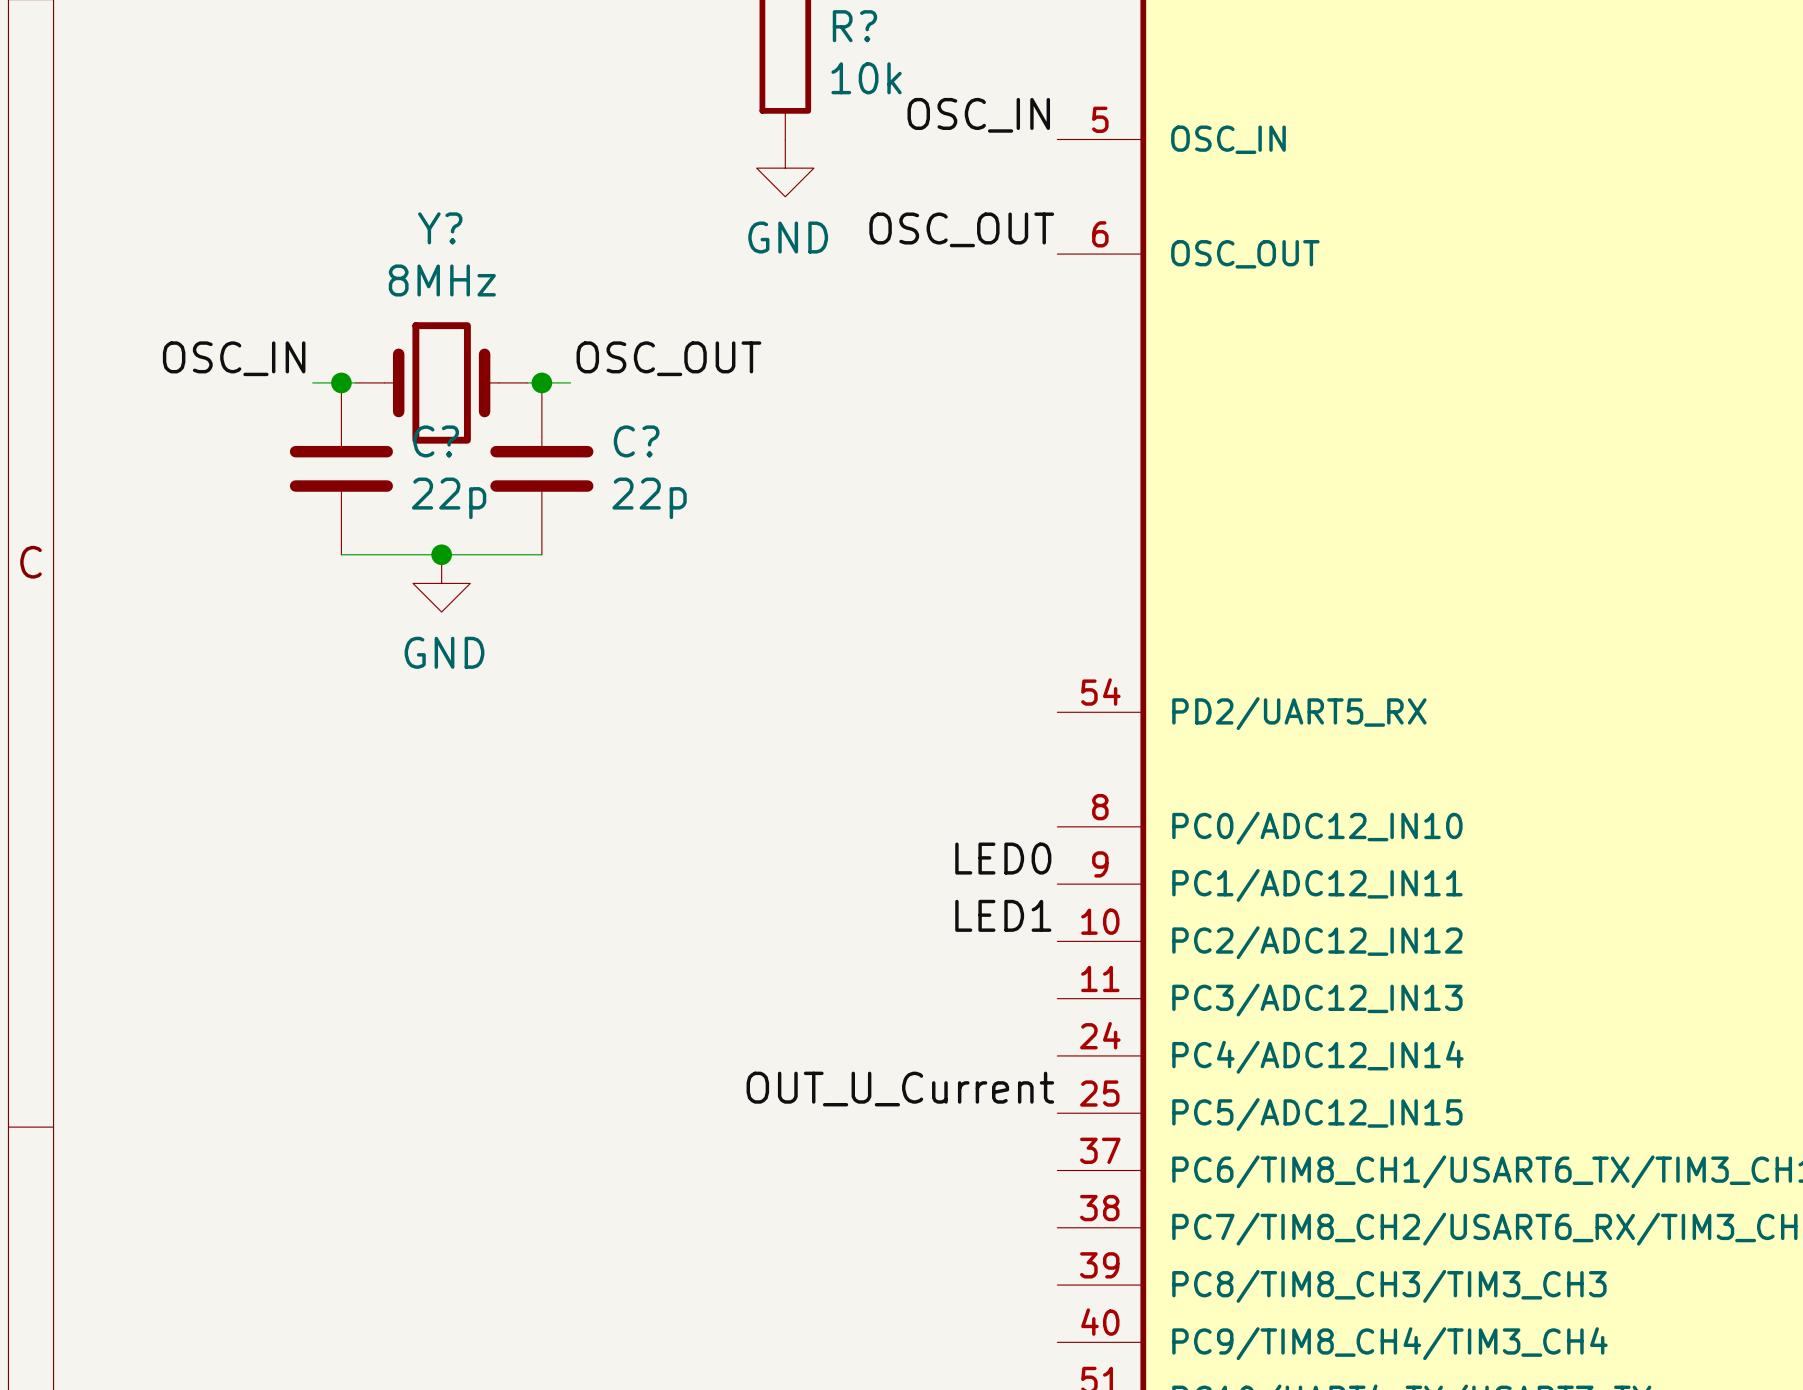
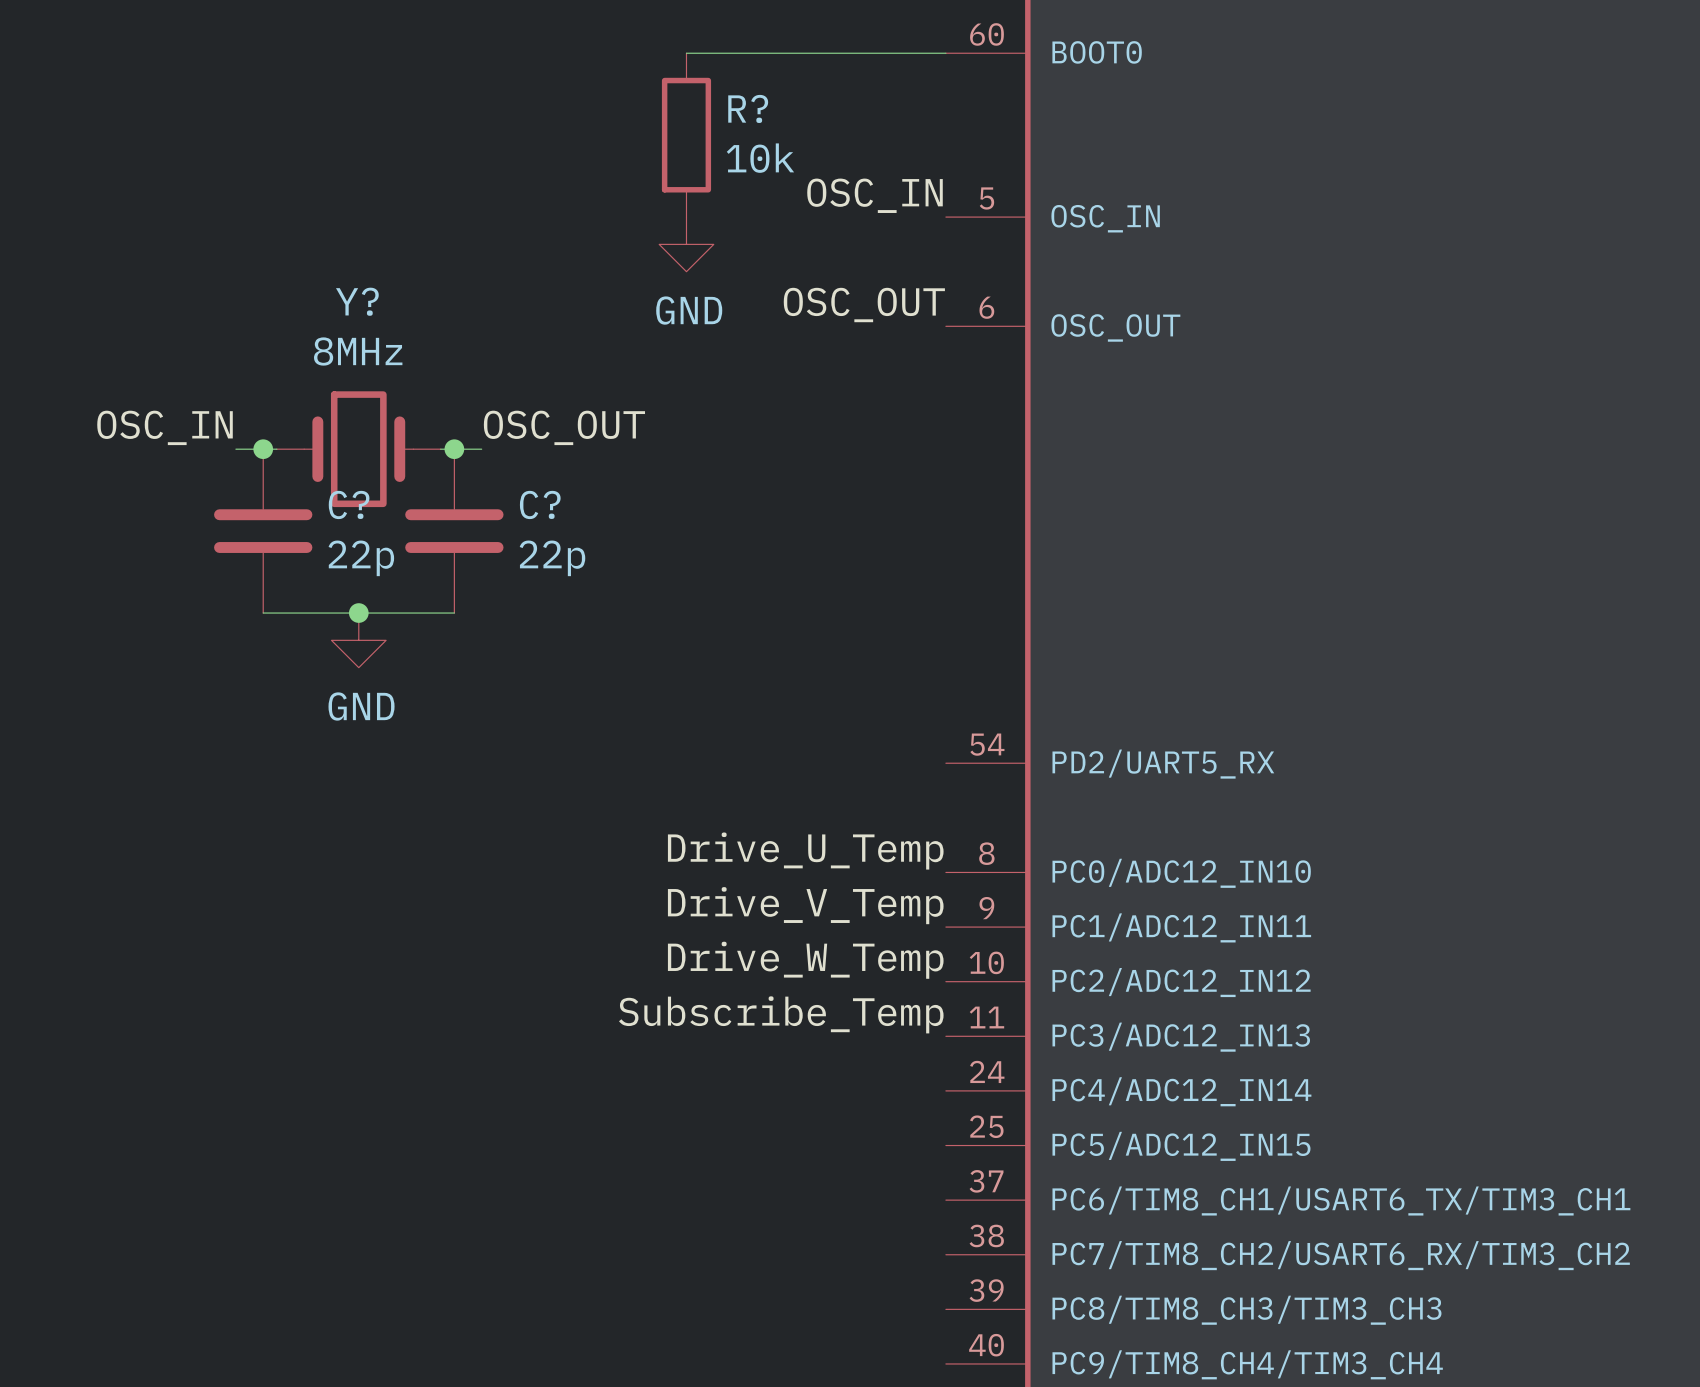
label: none -> Drive_U_Temp (805, 851)
label: LED0 (1003, 858) -> Drive_V_Temp (805, 905)
label: LED1 (1003, 915) -> Drive_W_Temp (805, 960)
label: none -> Subscribe_Temp (781, 1014)
label: OUT_U_Current (900, 1089) -> none

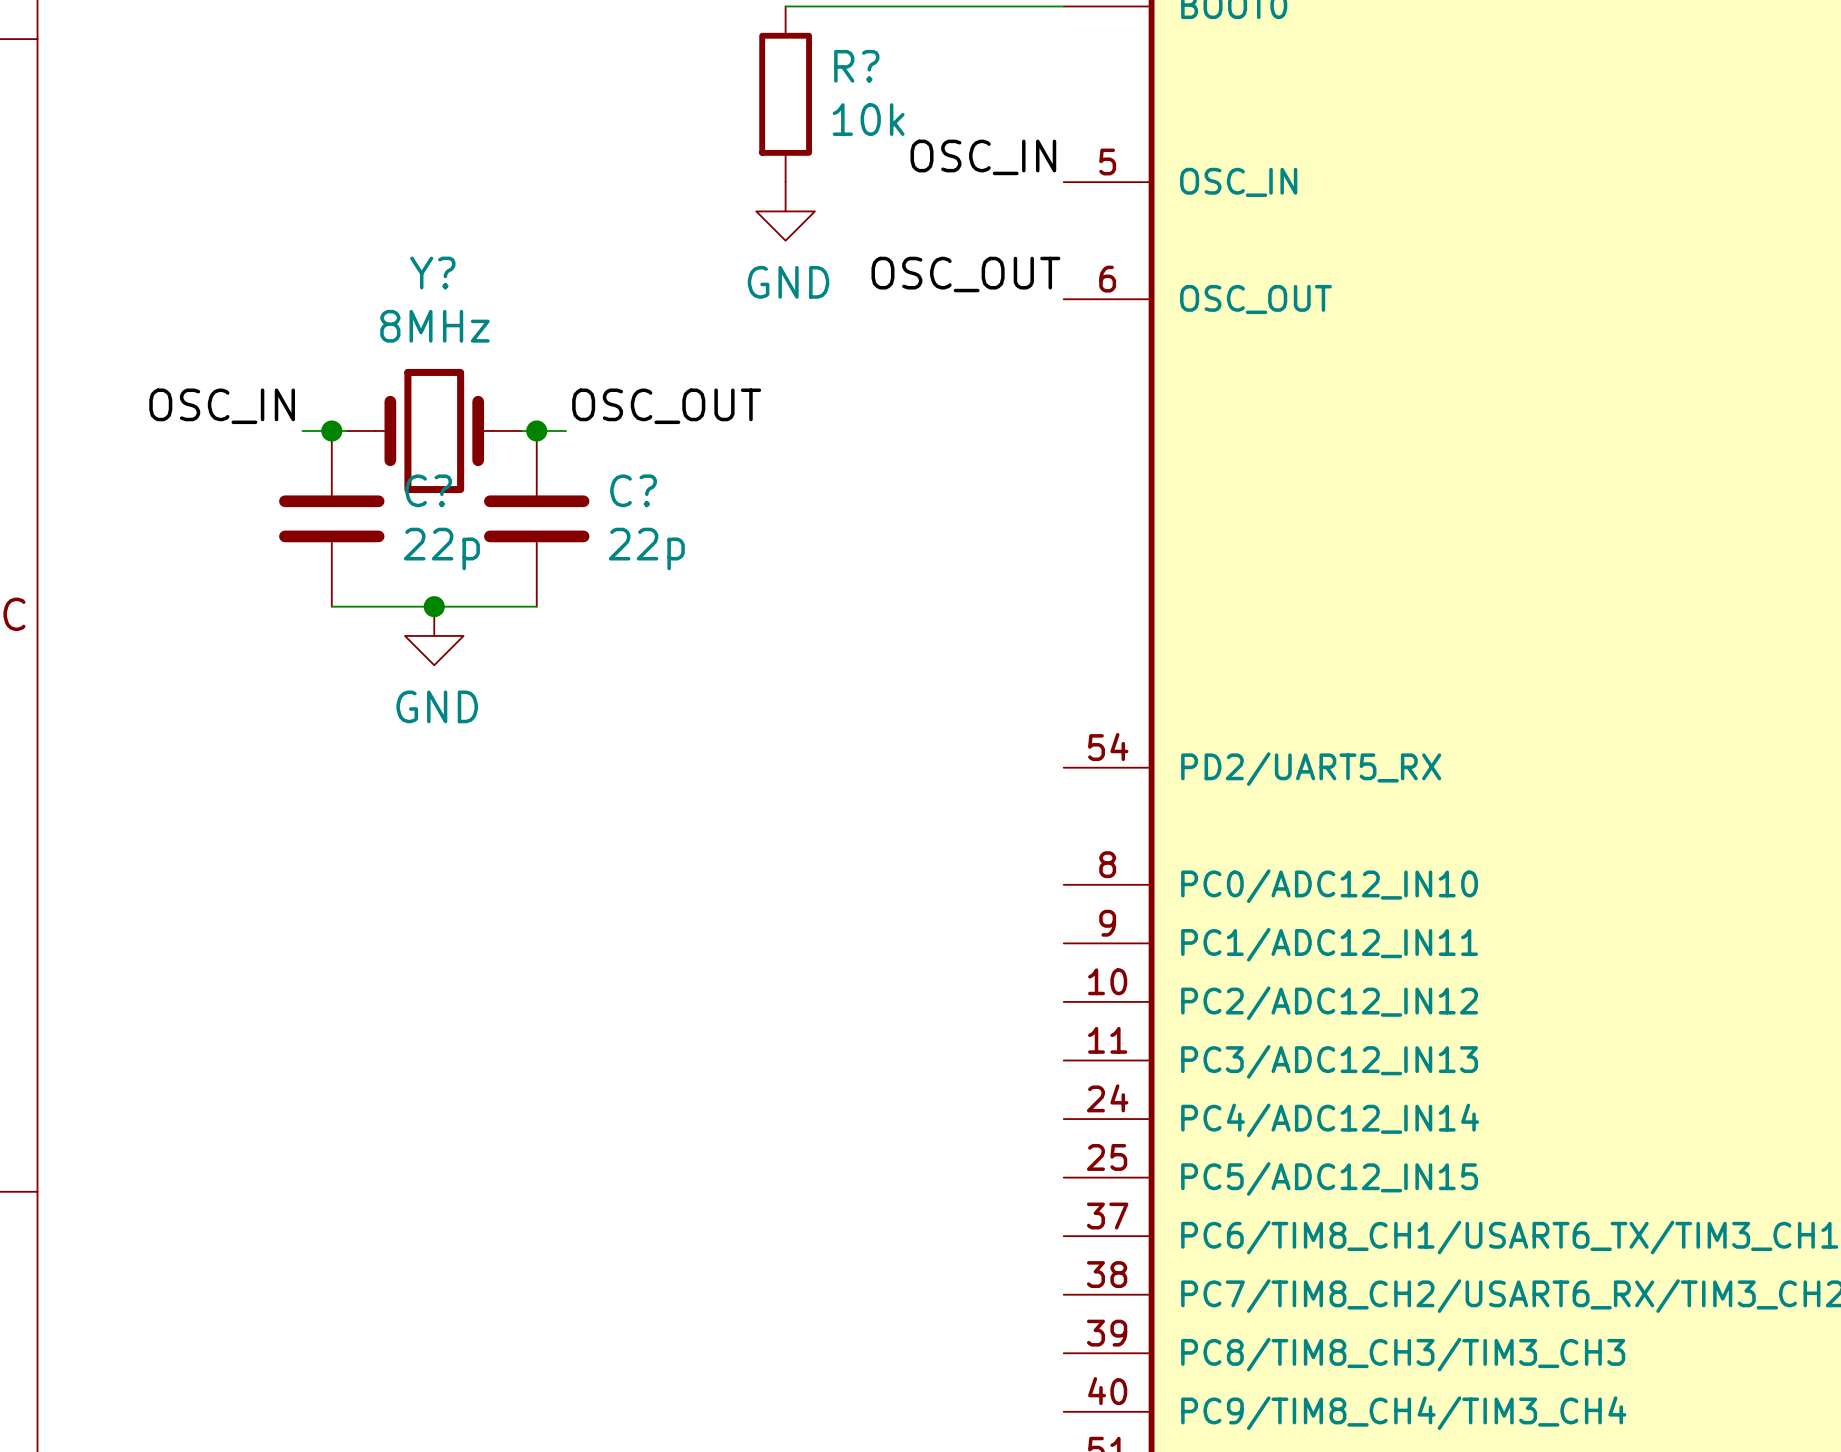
label: Drive_U_Temp (805, 851) -> none
label: Drive_V_Temp (805, 905) -> none
label: Drive_W_Temp (805, 960) -> none
label: Subscribe_Temp (781, 1014) -> none

